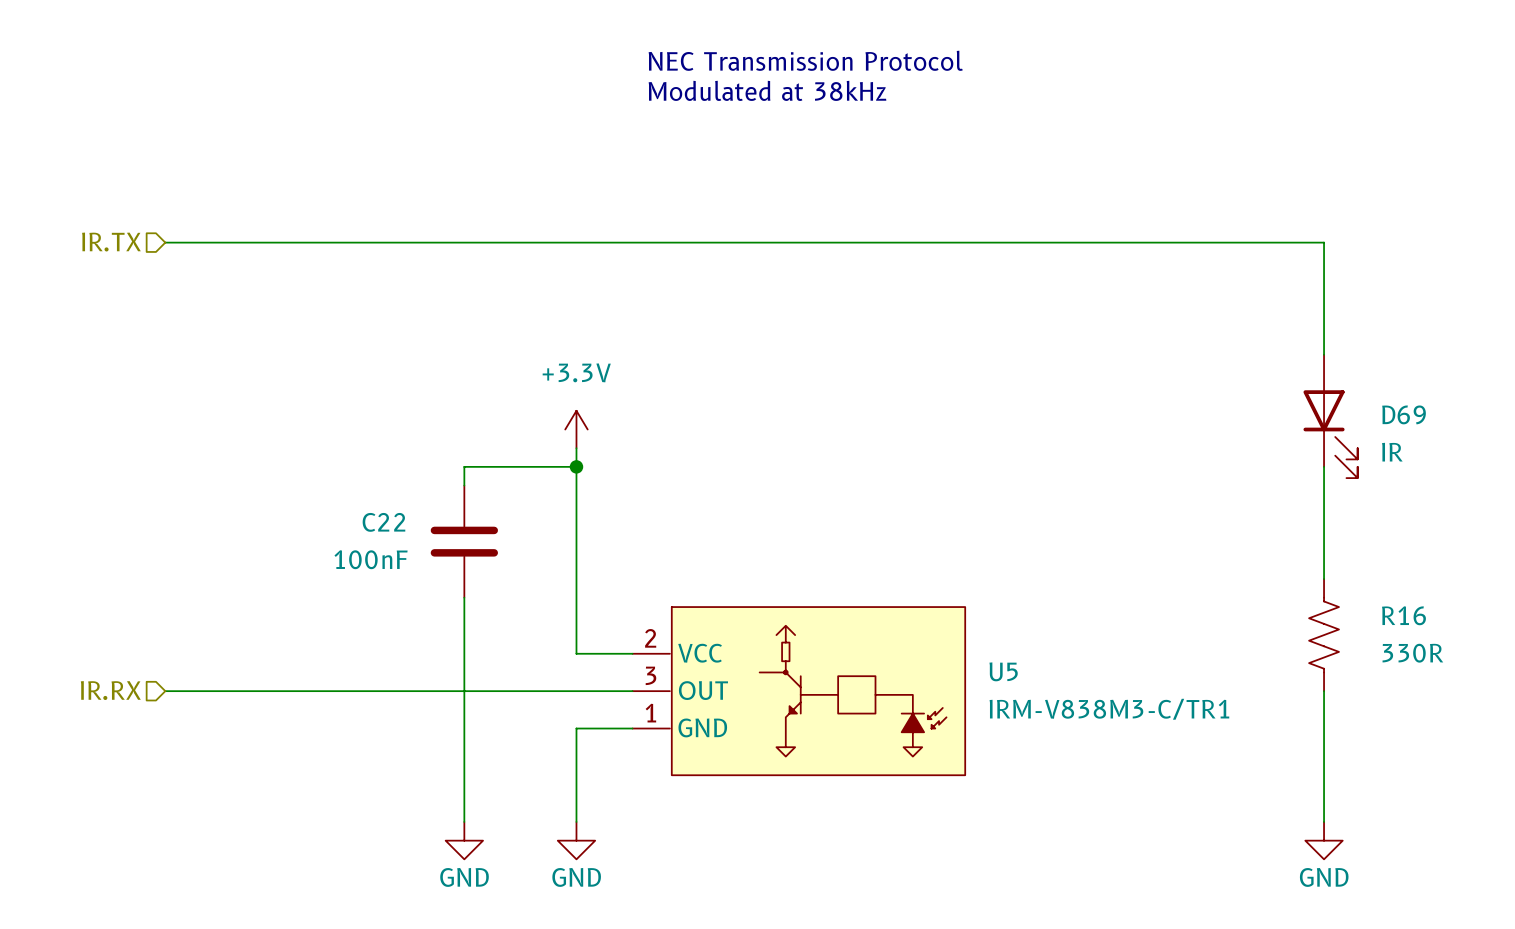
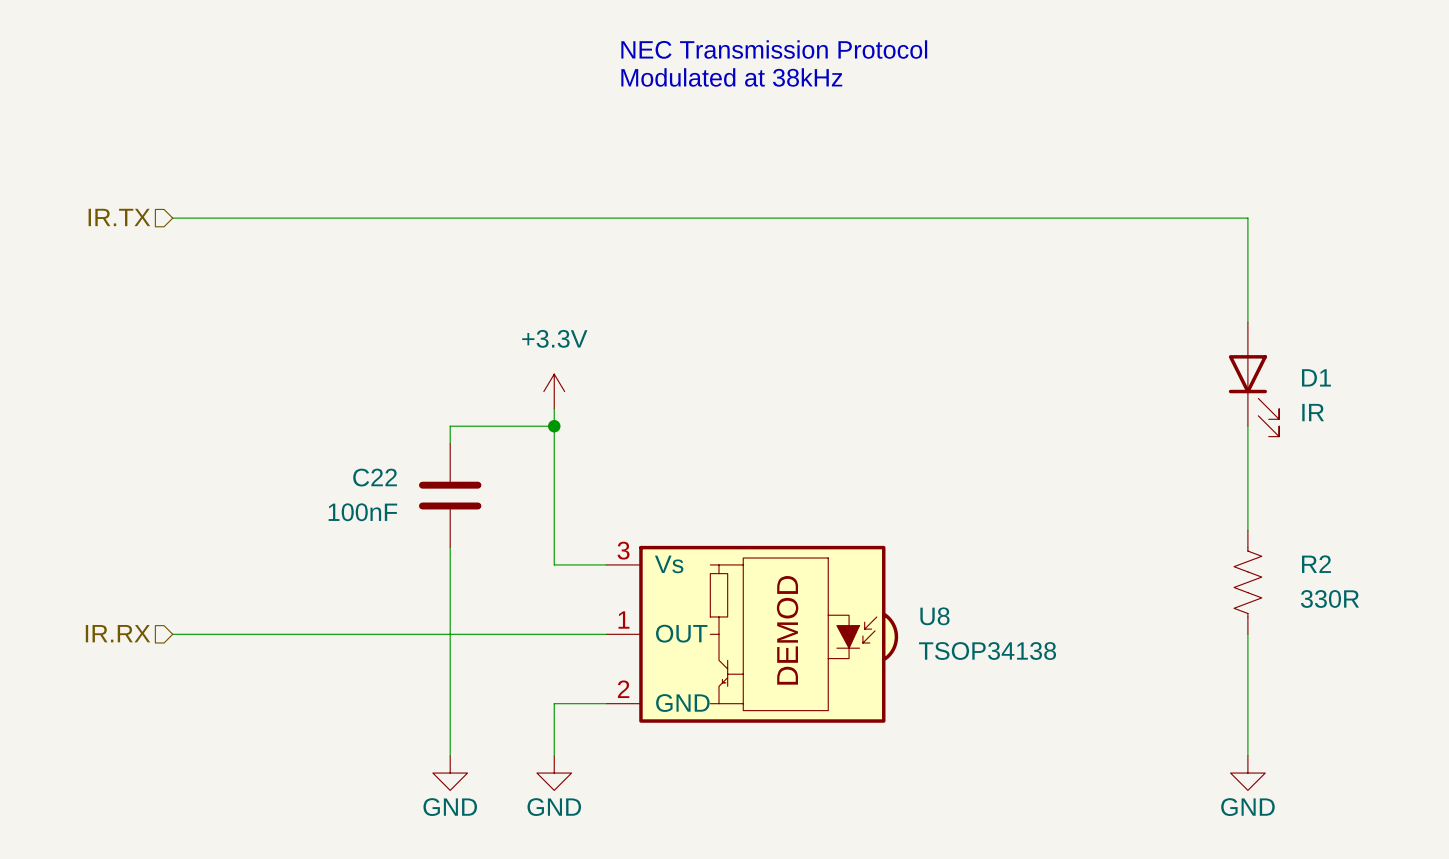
D69 name: D69 (1404, 414) -> D1 (1316, 377)
R16 name: R16 (1403, 615) -> R2 (1316, 564)
wire: (576, 616) (576, 653) (632, 653) -> (554, 564) (606, 564)
U8: none -> TSOP34138 (752, 634)
U5: IRM-V838M3-C/TR1 (798, 691) -> none
wire: (632, 728) (576, 728) (576, 765) -> (606, 703) (554, 703)

